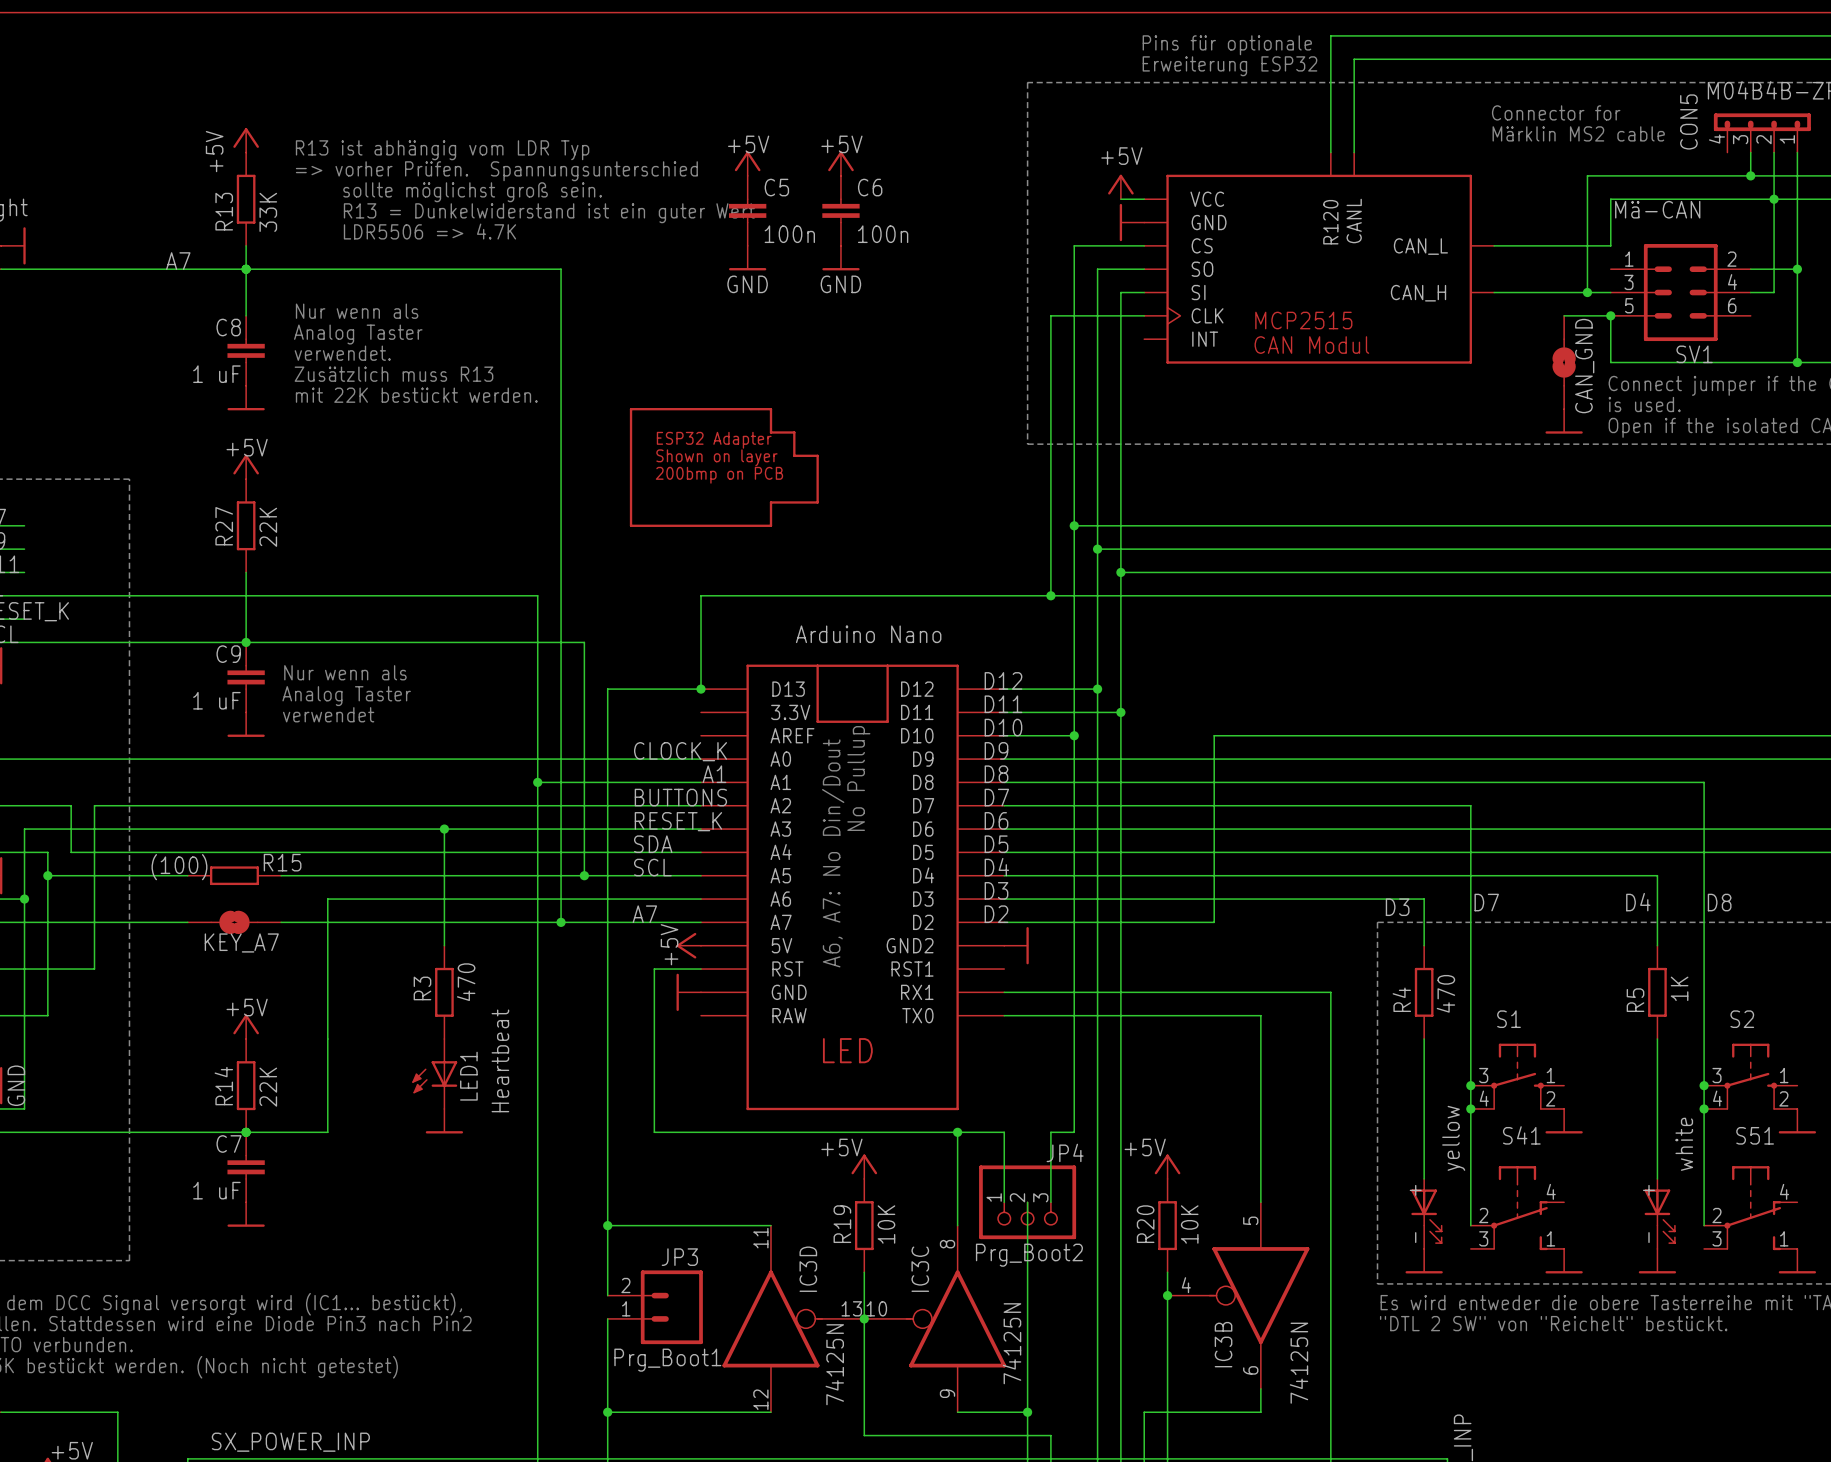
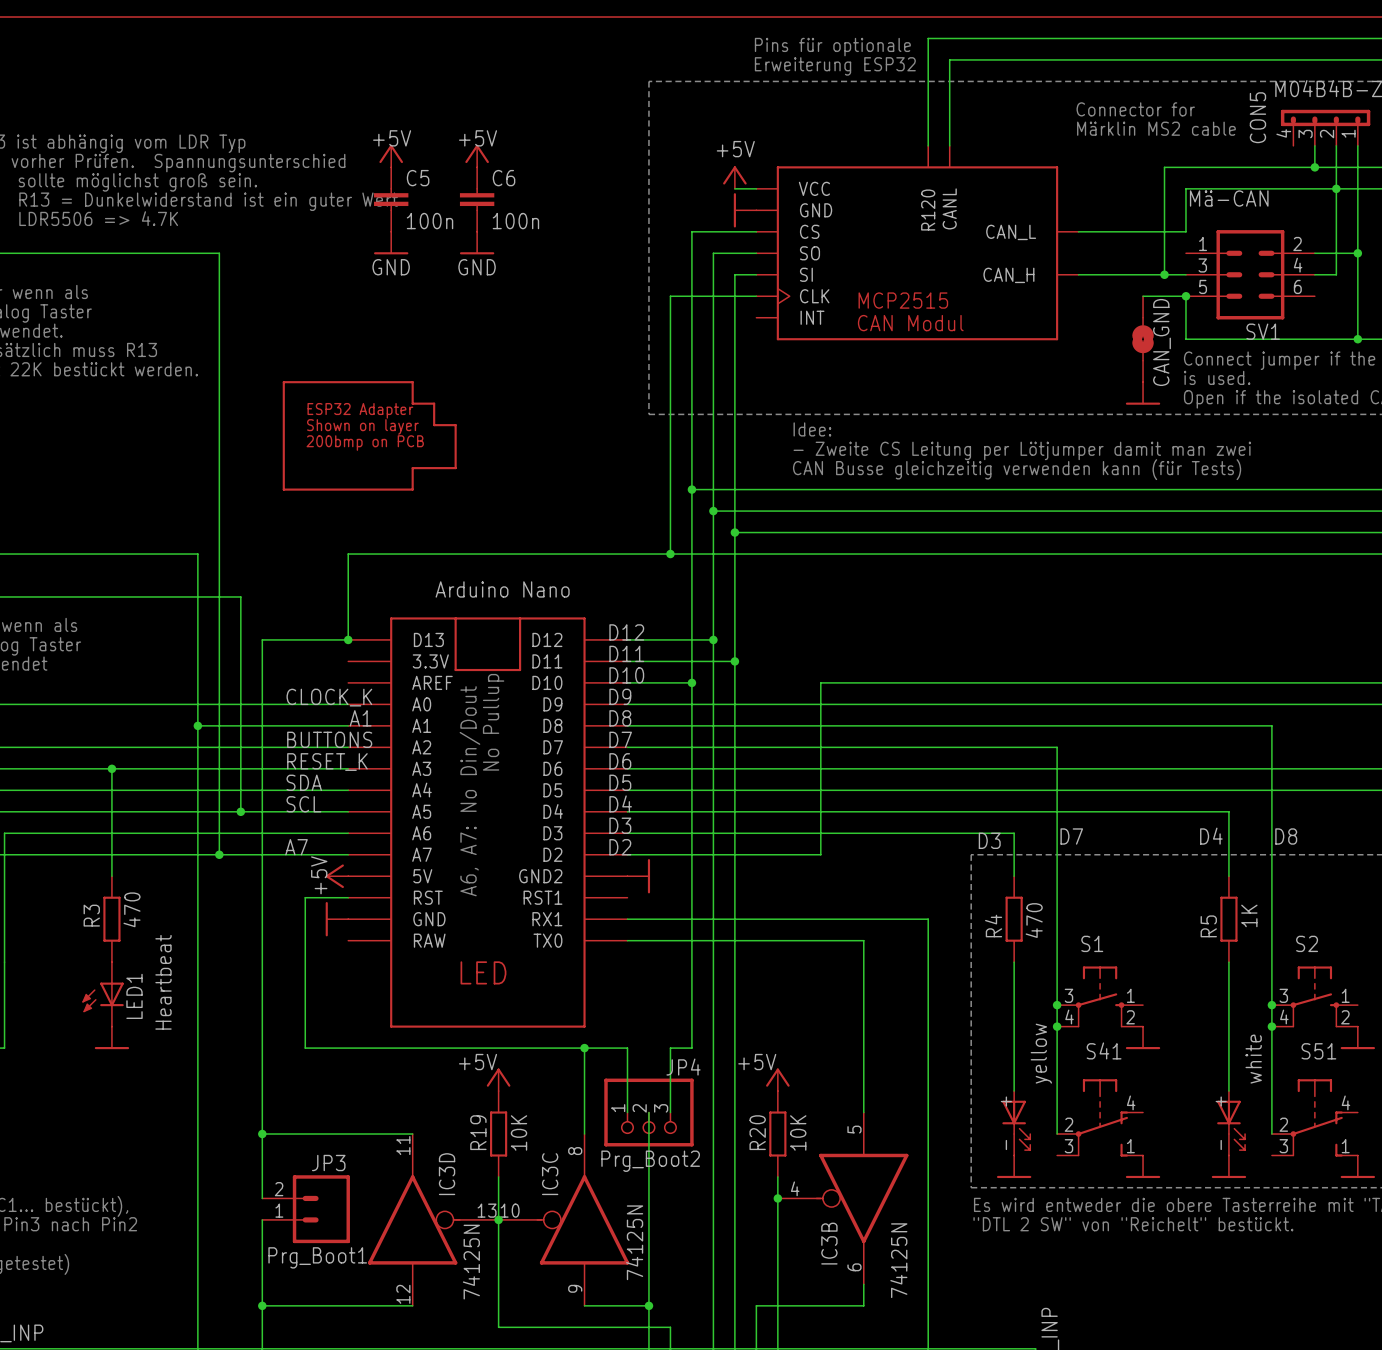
text: none -> Idee: (812, 429)
text: none -> - Zweite CS Leitung per Lötjumper damit man zwei (1022, 450)
text: none -> CAN Busse gleichzeitig verwenden kann (für Tests) (1017, 469)

